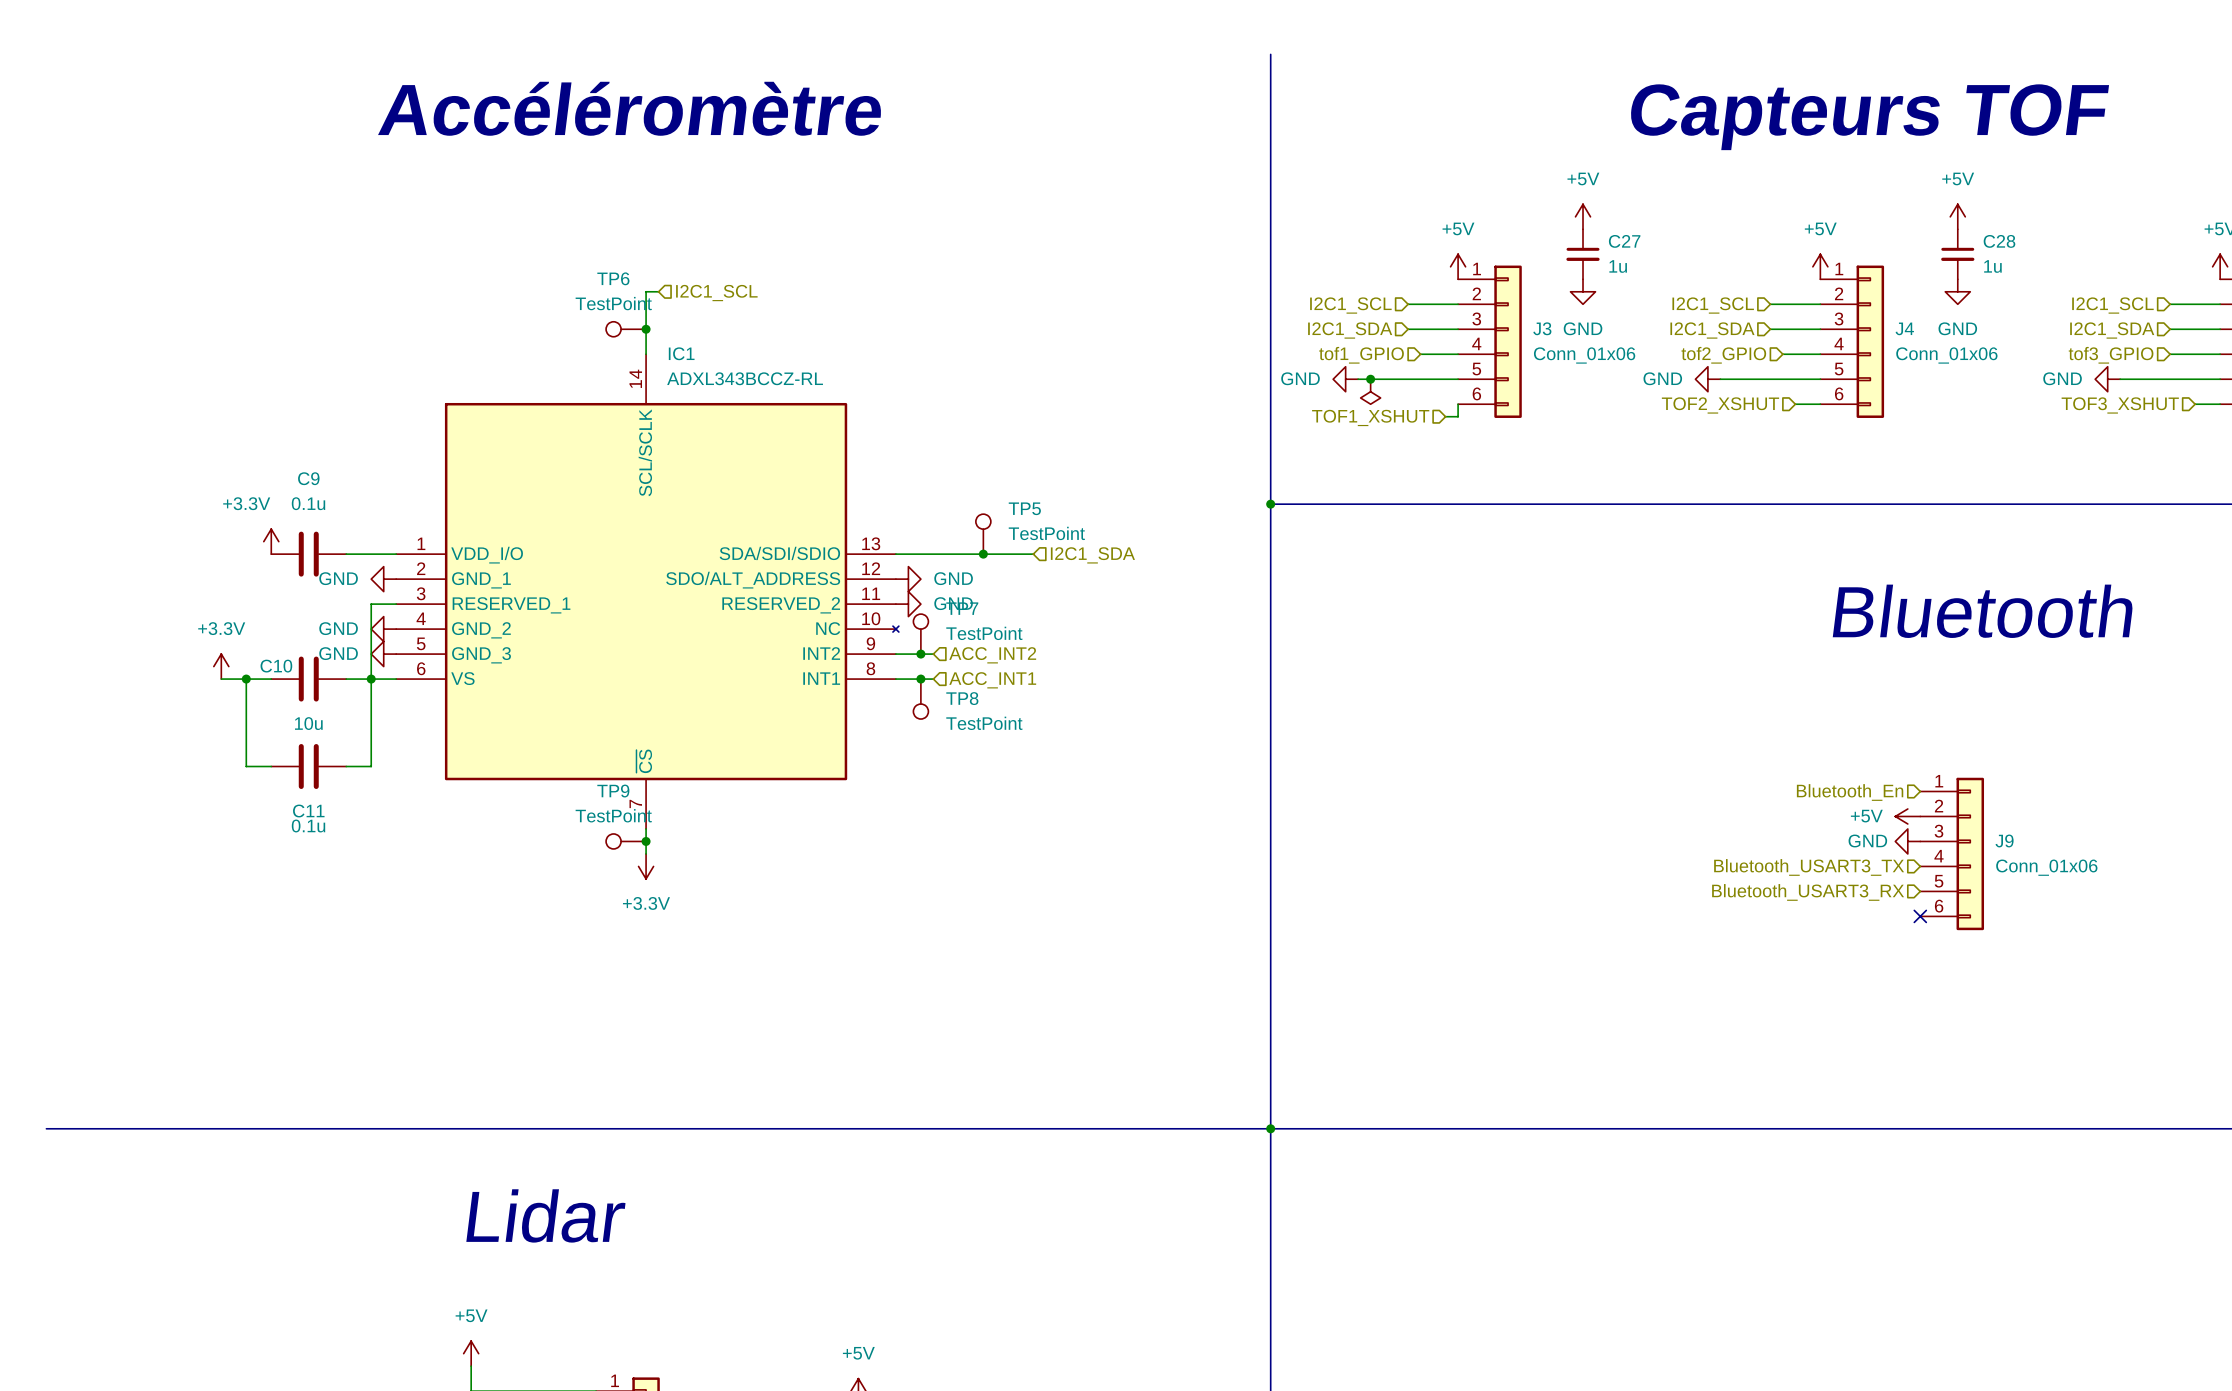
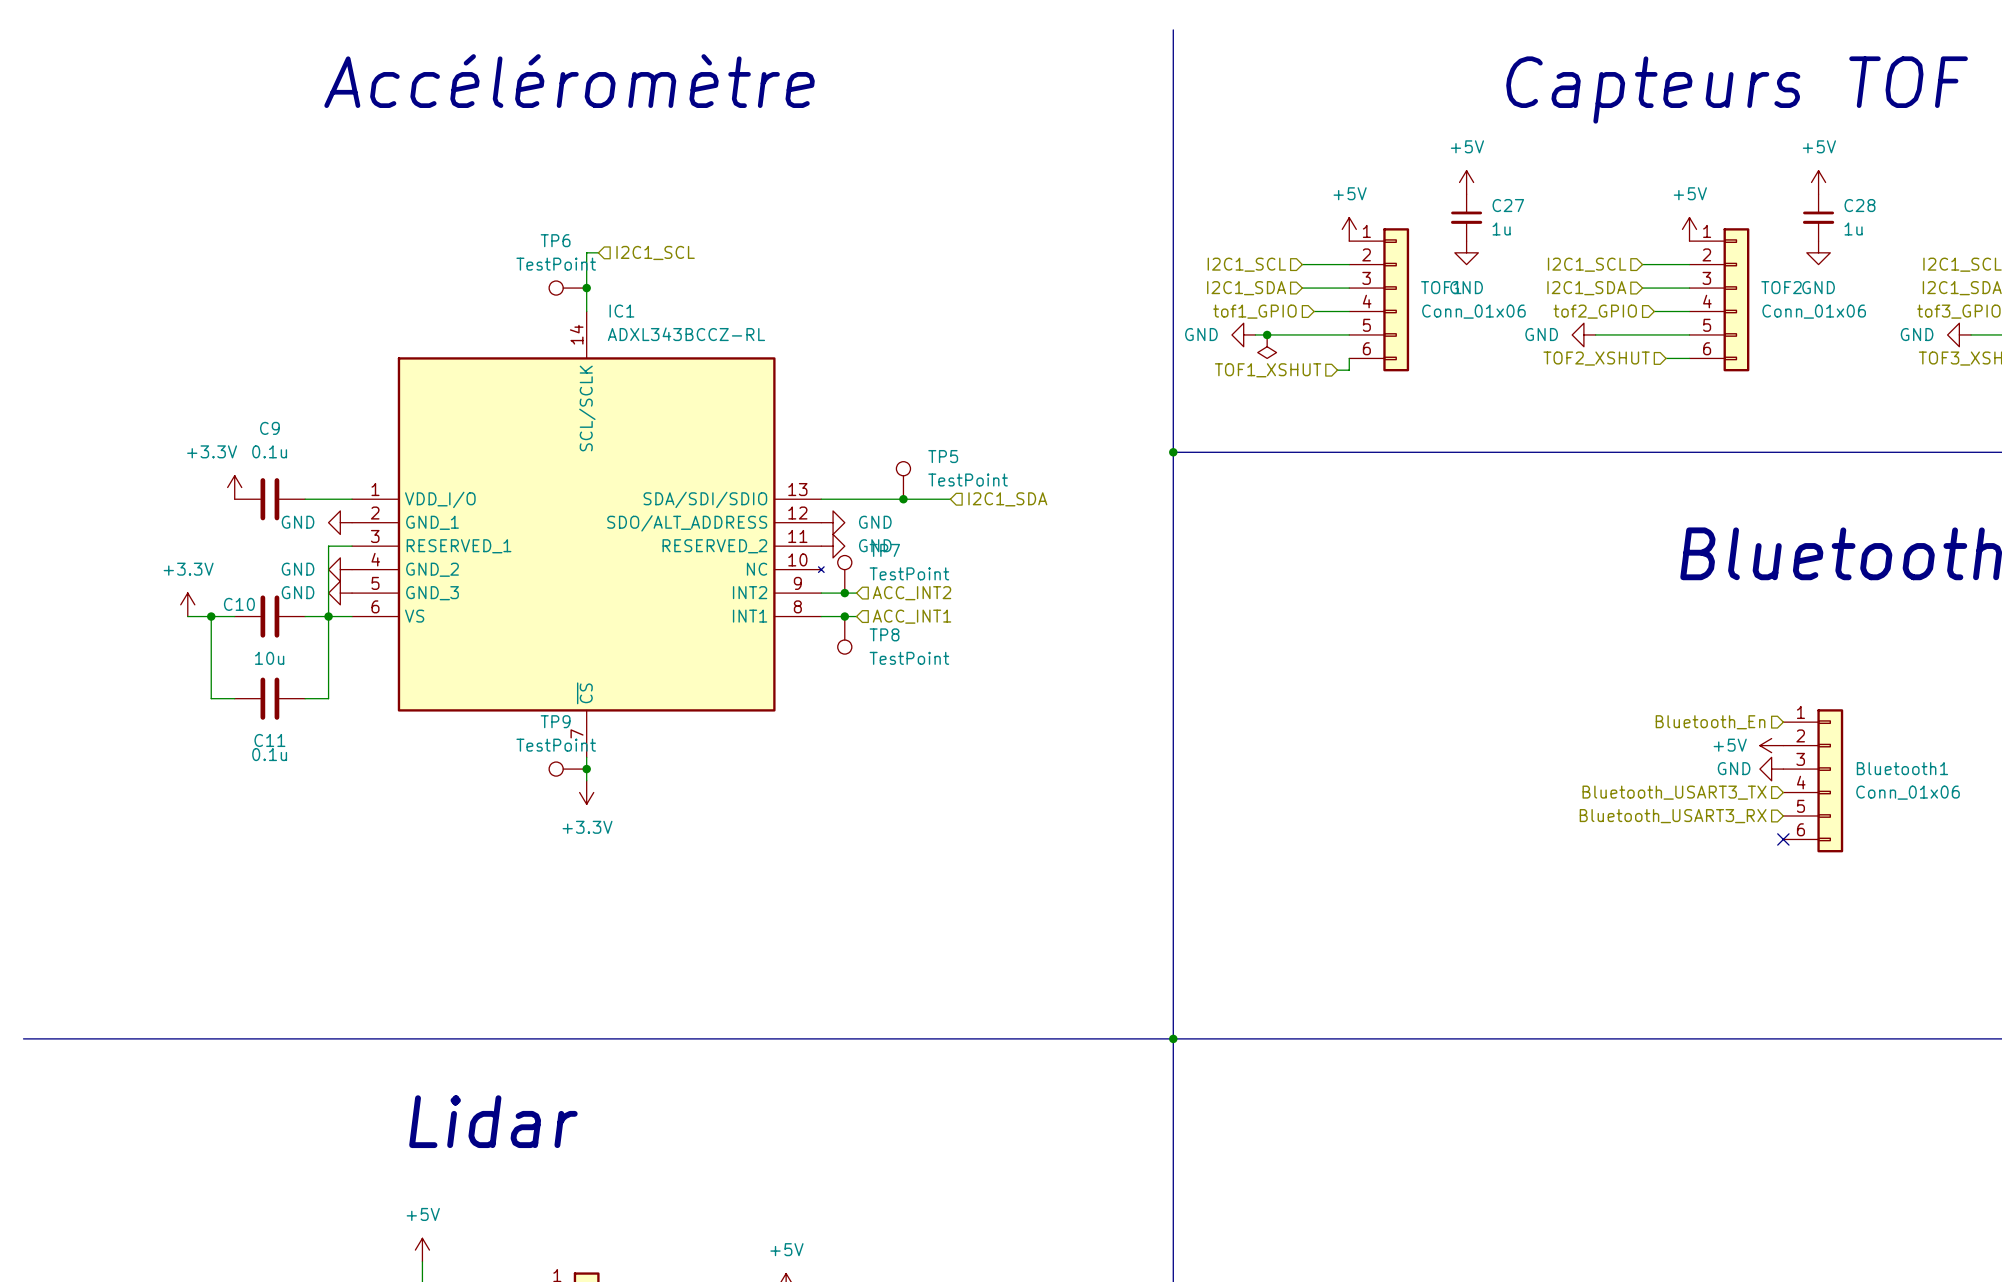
J3 name: J3 (1542, 328) -> TOF1 (1441, 287)
J4 name: J4 (1904, 328) -> TOF2 (1781, 287)
J9 name: J9 (2004, 840) -> Bluetooth1 (1902, 768)

